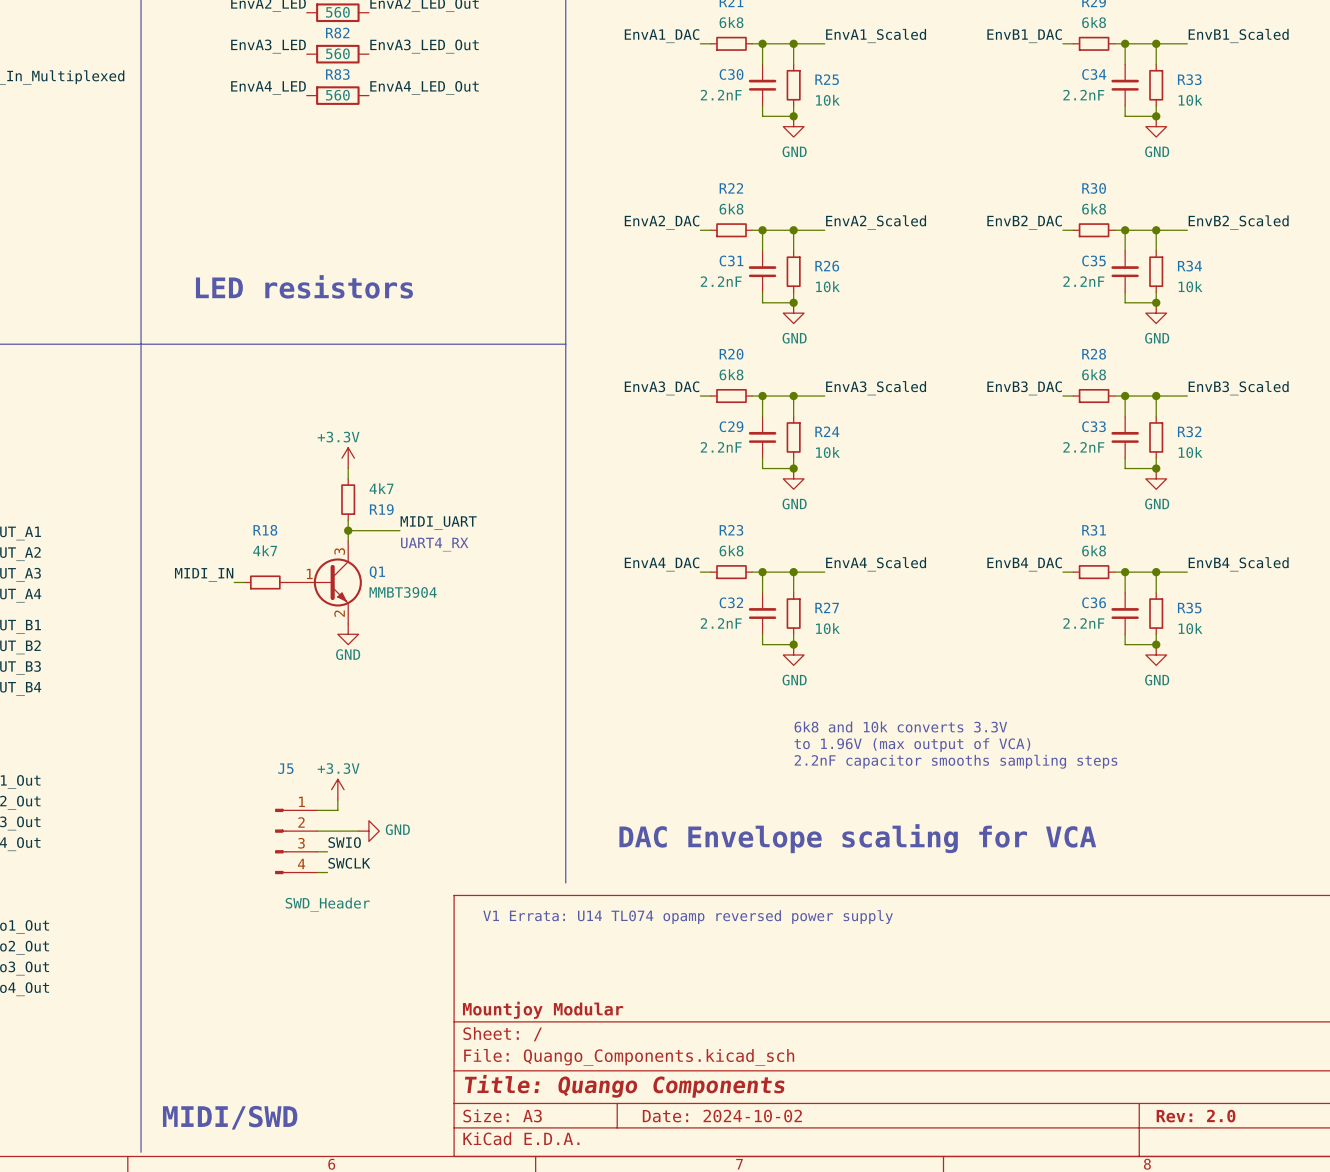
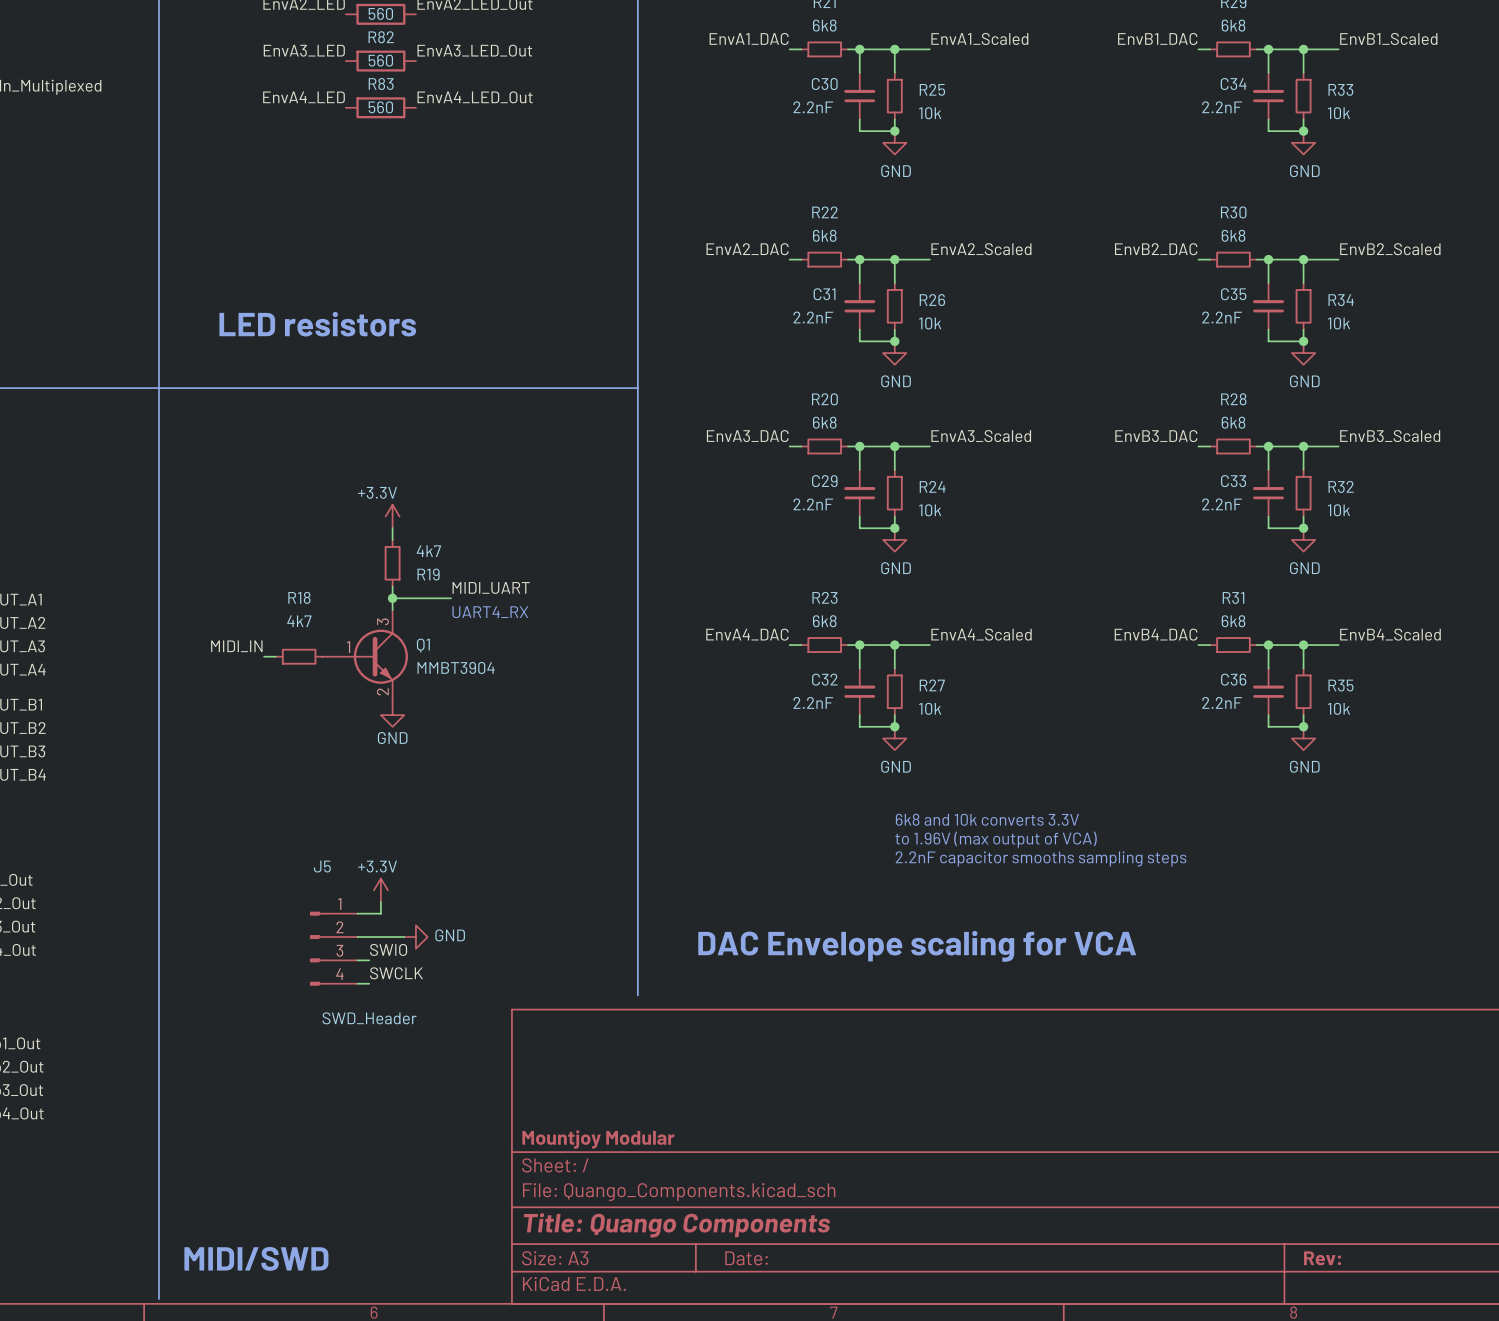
text: V1 Errata: U14 TL074 opamp reversed power supply (688, 917) -> none
title block: Date: 2024-10-02 (722, 1116) -> Date: (746, 1258)
title block: Rev: 2.0 (1196, 1116) -> Rev: (1322, 1258)

